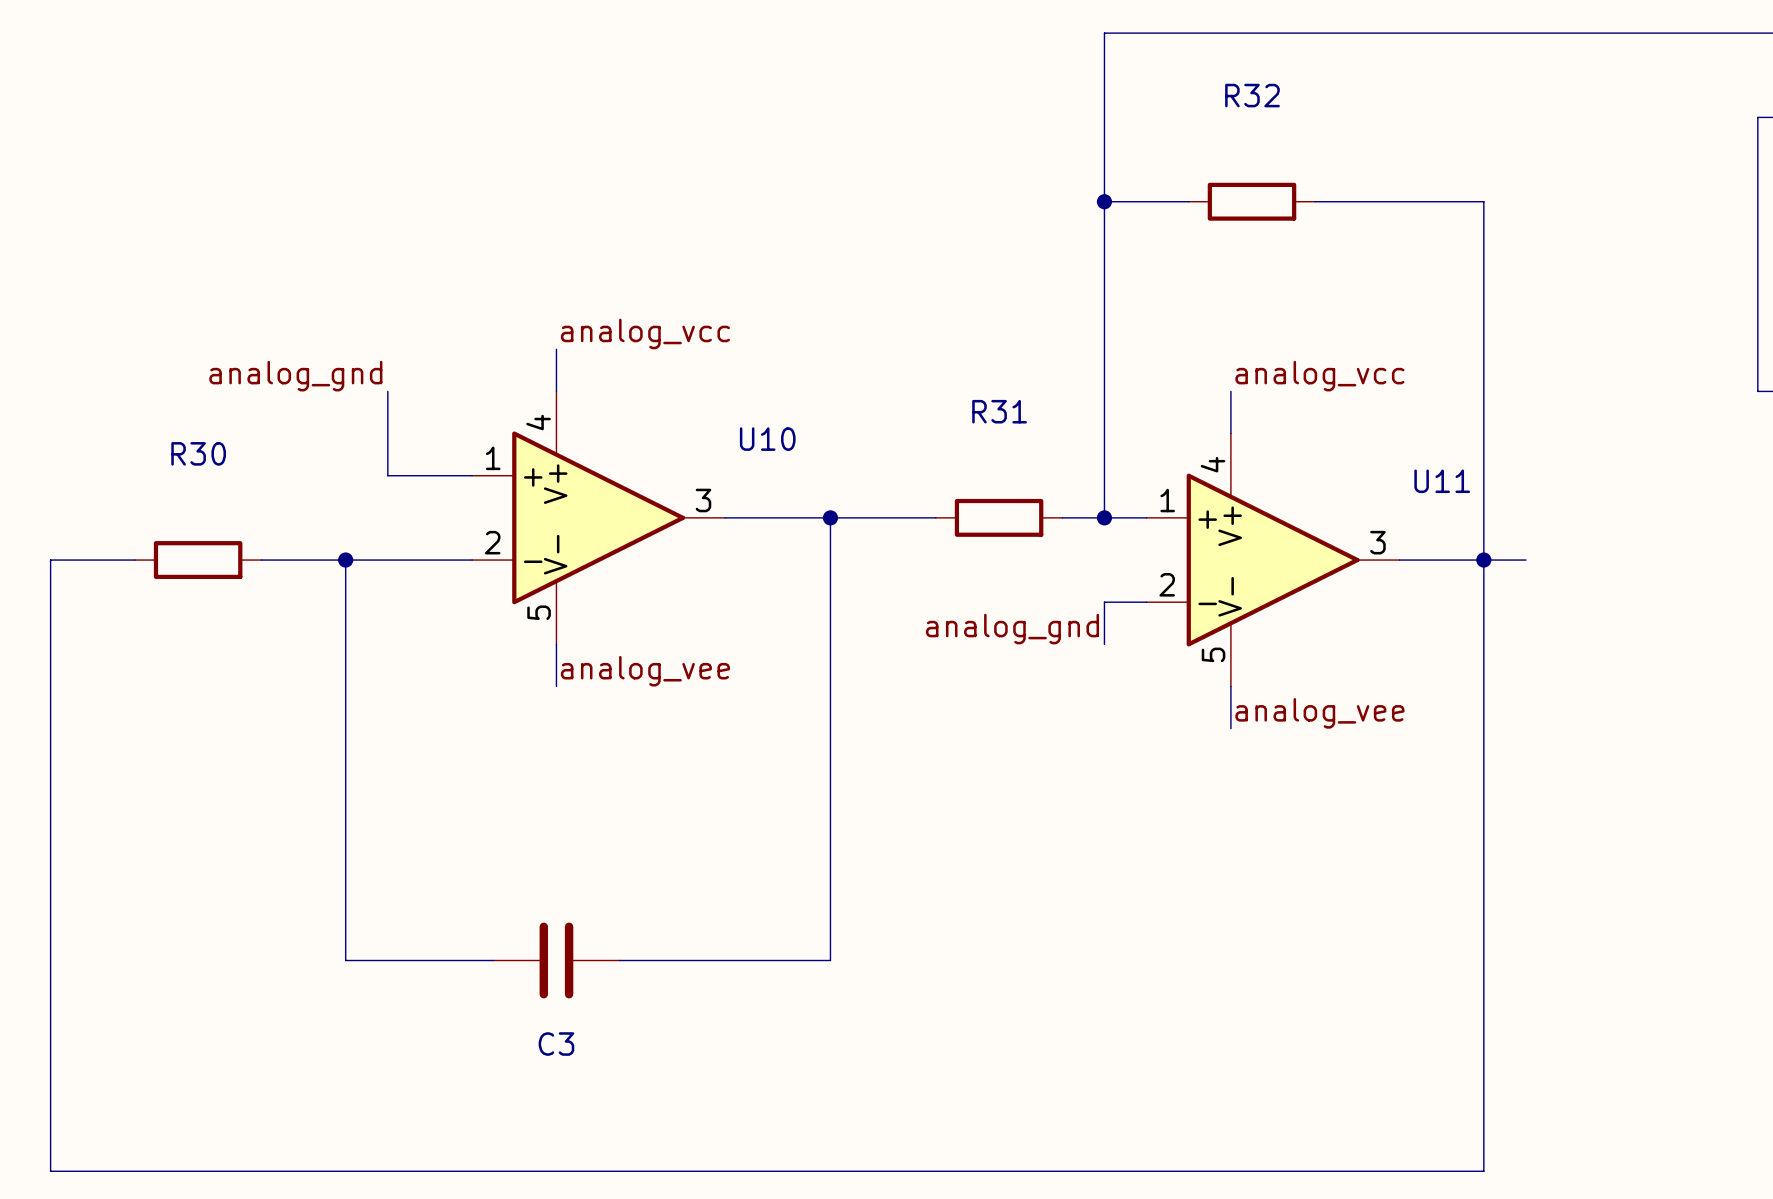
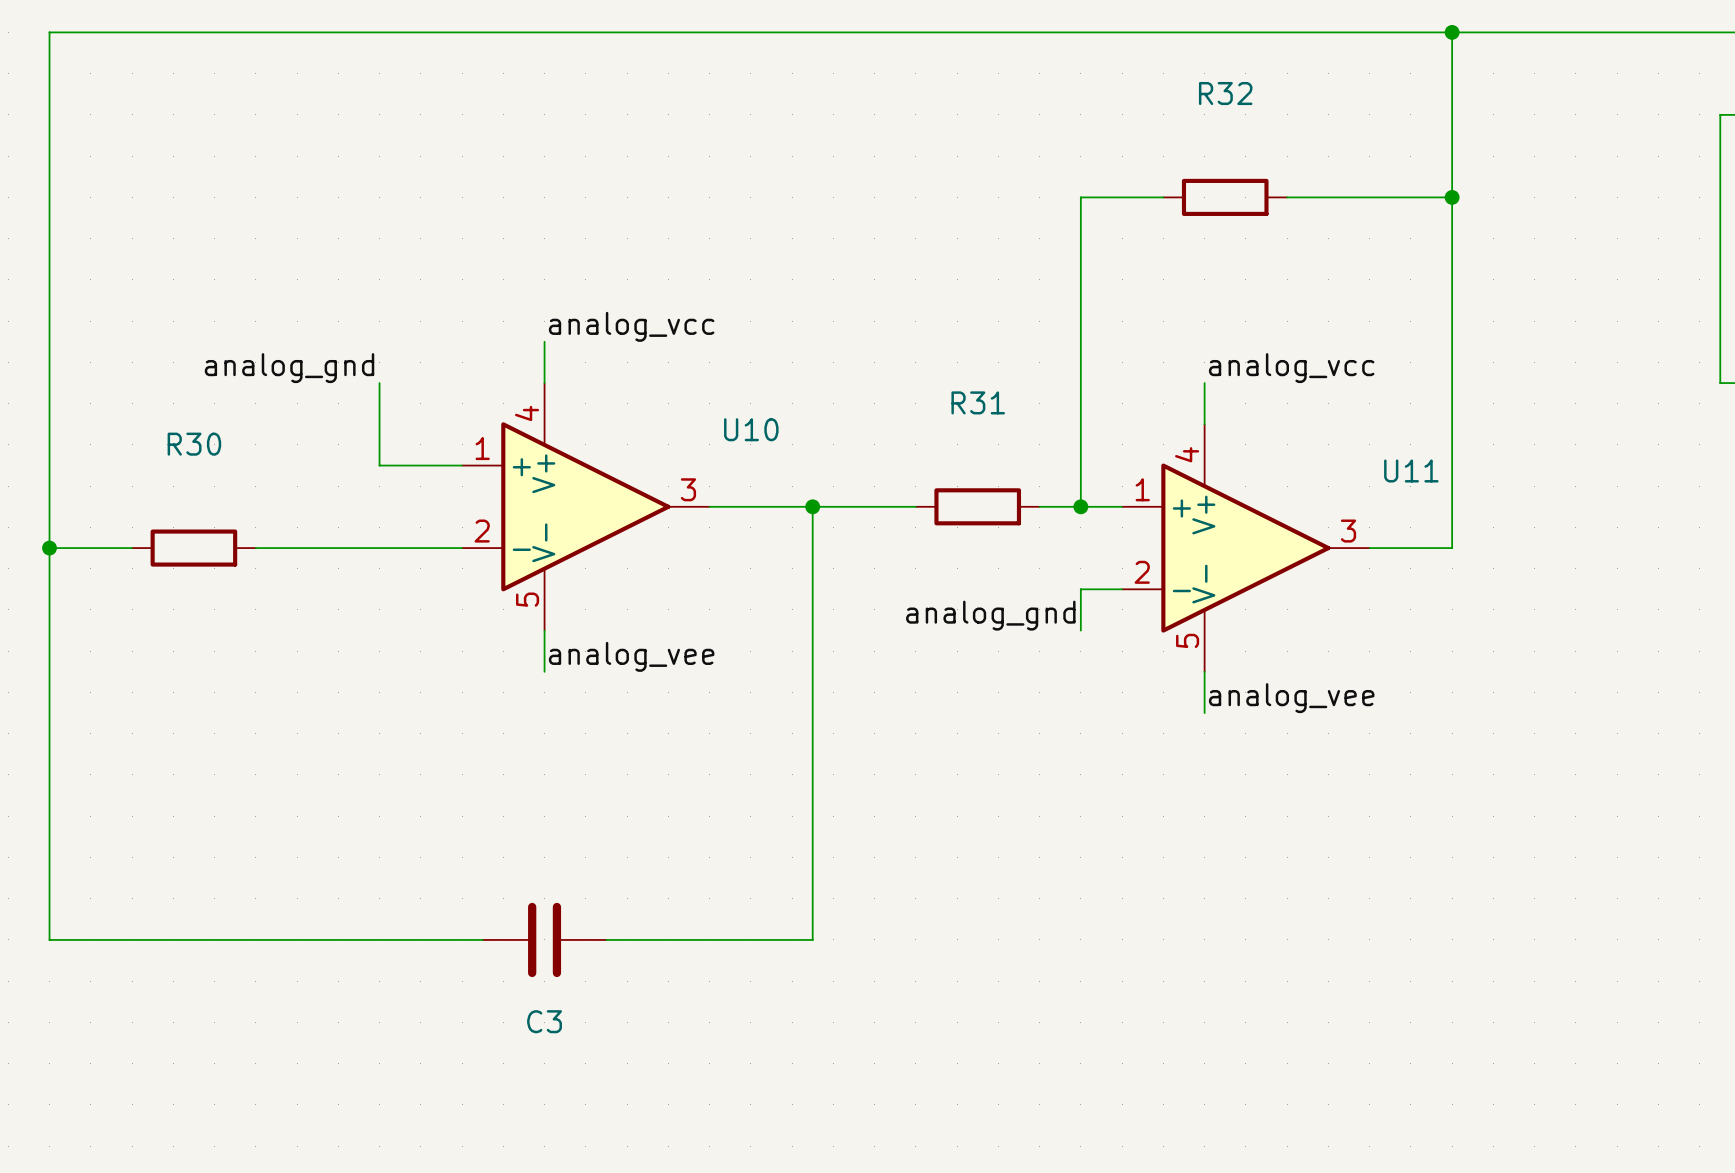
wire: (1104, 33) (1104, 201) -> (1080, 32) (49, 32) (49, 548)
wire: none -> (1452, 32) (1452, 197)
junction: none -> (1452, 32)
junction: (1104, 201) -> none
junction: none -> (1452, 197)
junction: none -> (49, 548)
wire: (345, 560) (345, 960) -> (49, 939) (338, 939)
junction: (345, 560) -> none
junction: (1483, 560) -> none
wire: (1526, 560) (1483, 560) (1483, 1171) (50, 1171) (50, 960) -> none

